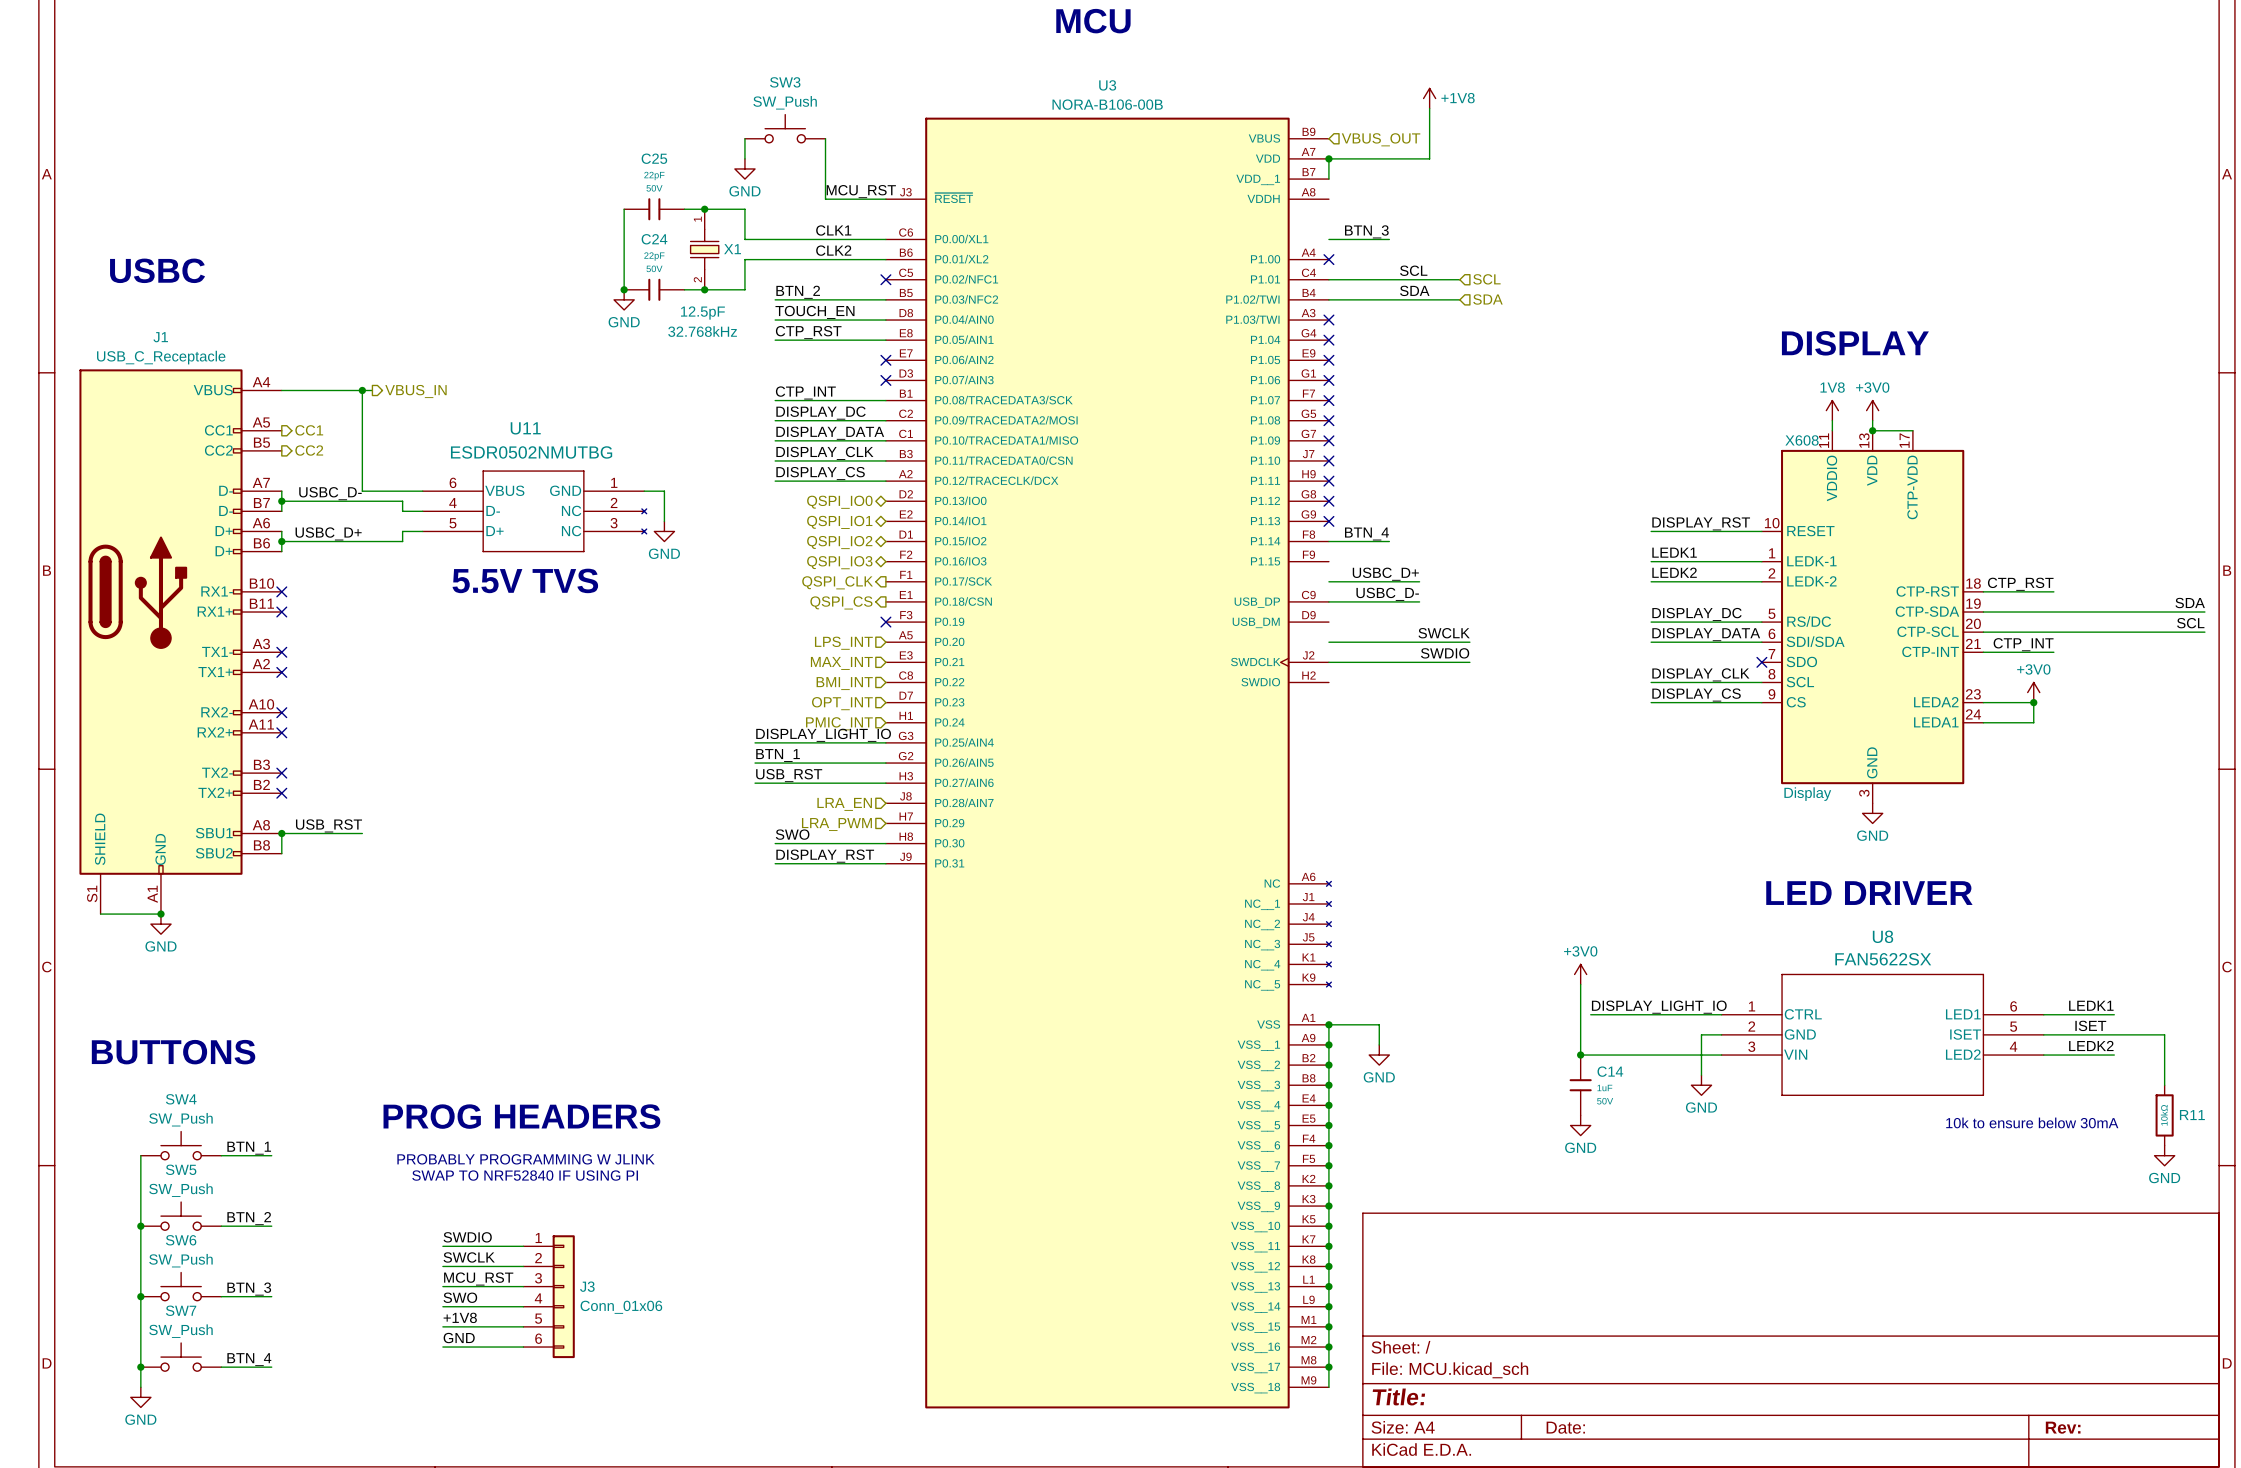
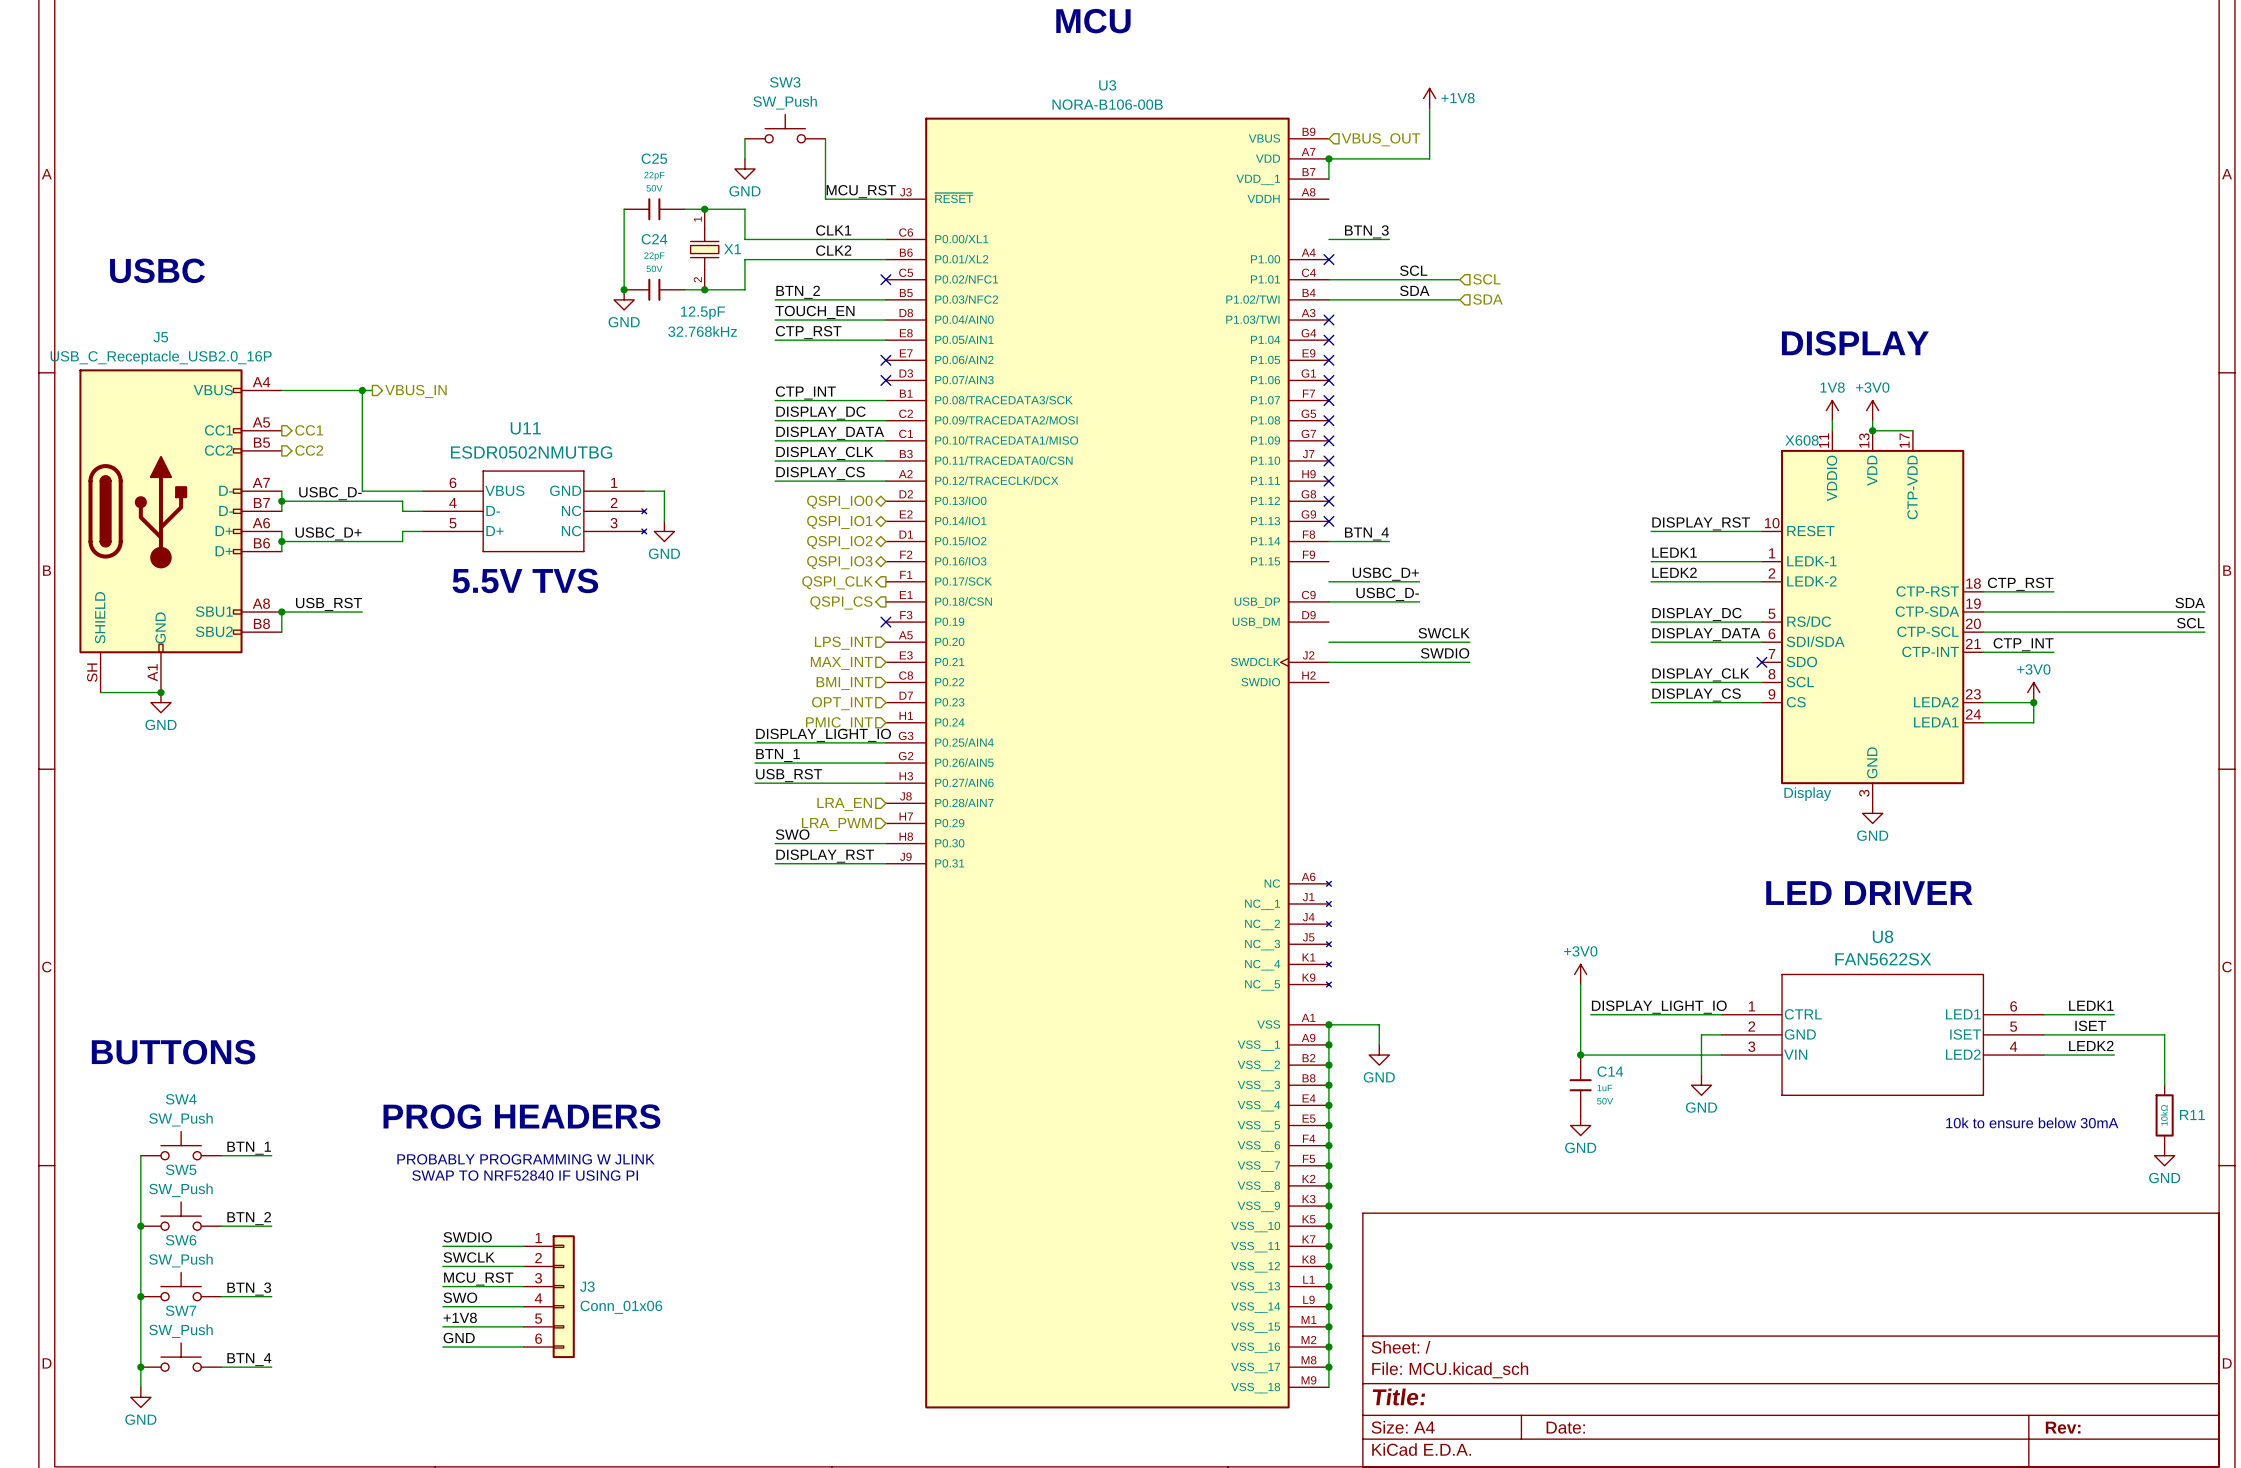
J5: none -> USB_C_Receptacle_USB2.0_16P (180, 530)
no-connect mark: (281, 591) -> none
label: none -> USB_RST (329, 604)
junction: none -> (281, 612)
no-connect mark: (281, 612) -> none
wire: none -> (362, 612) (281, 612) (281, 632)
J1: USB_C_Receptacle (180, 641) -> none
no-connect mark: (281, 652) -> none
no-connect mark: (281, 672) -> none
junction: none -> (160, 692)
power symbol: none -> GND (160, 702)
no-connect mark: (281, 712) -> none
no-connect mark: (281, 732) -> none
no-connect mark: (281, 773) -> none
no-connect mark: (281, 793) -> none
label: USB_RST (329, 825) -> none
junction: (281, 833) -> none
wire: (362, 833) (281, 833) (281, 853) -> none
wire: (100, 914) (160, 914) -> none
junction: (160, 914) -> none
power symbol: GND (160, 924) -> none

